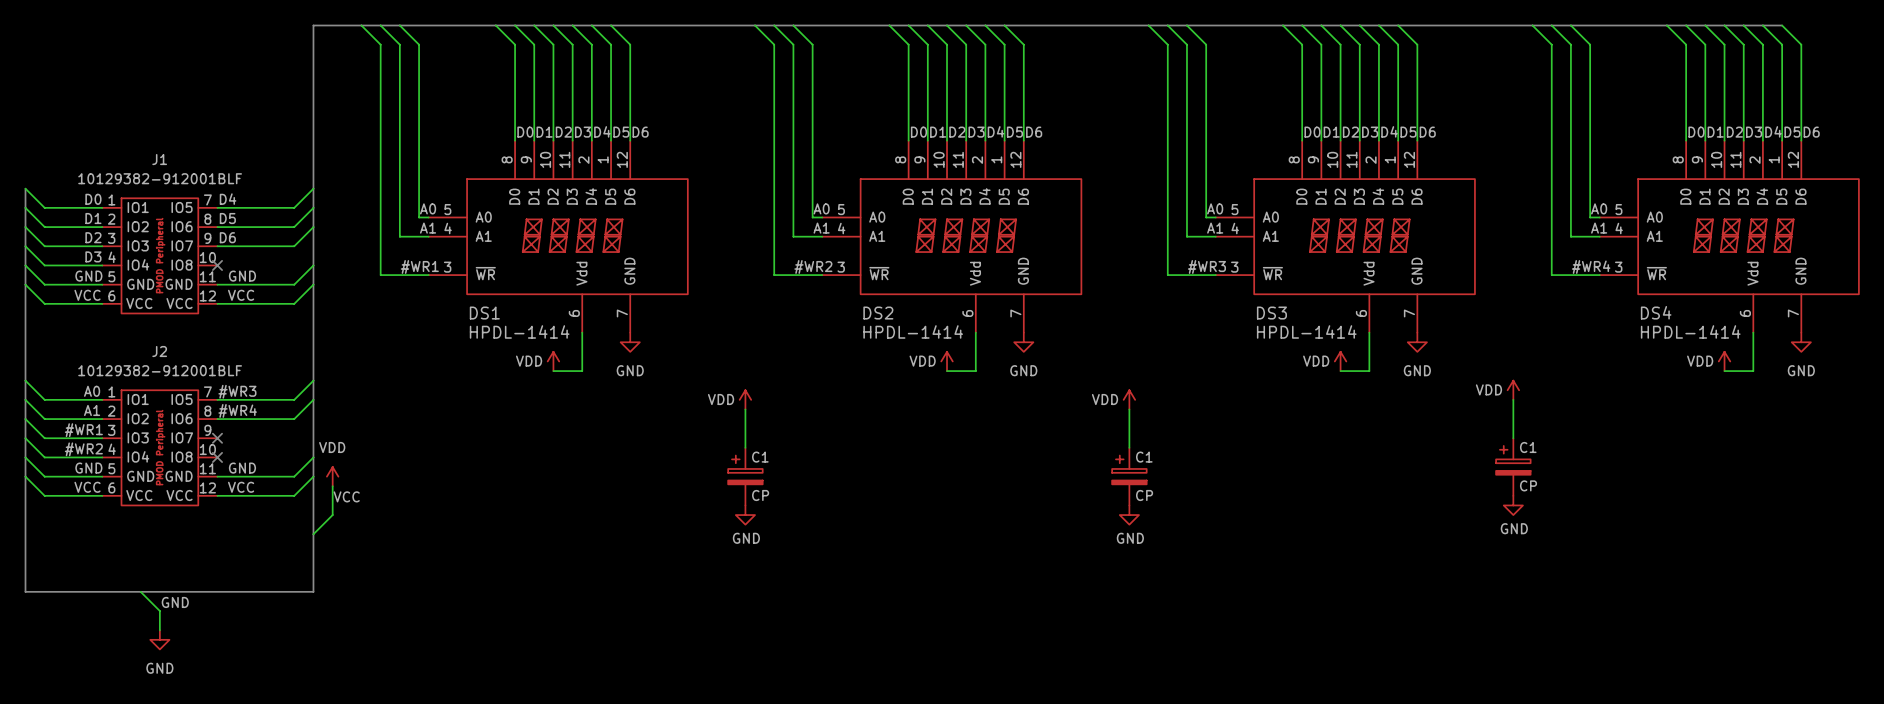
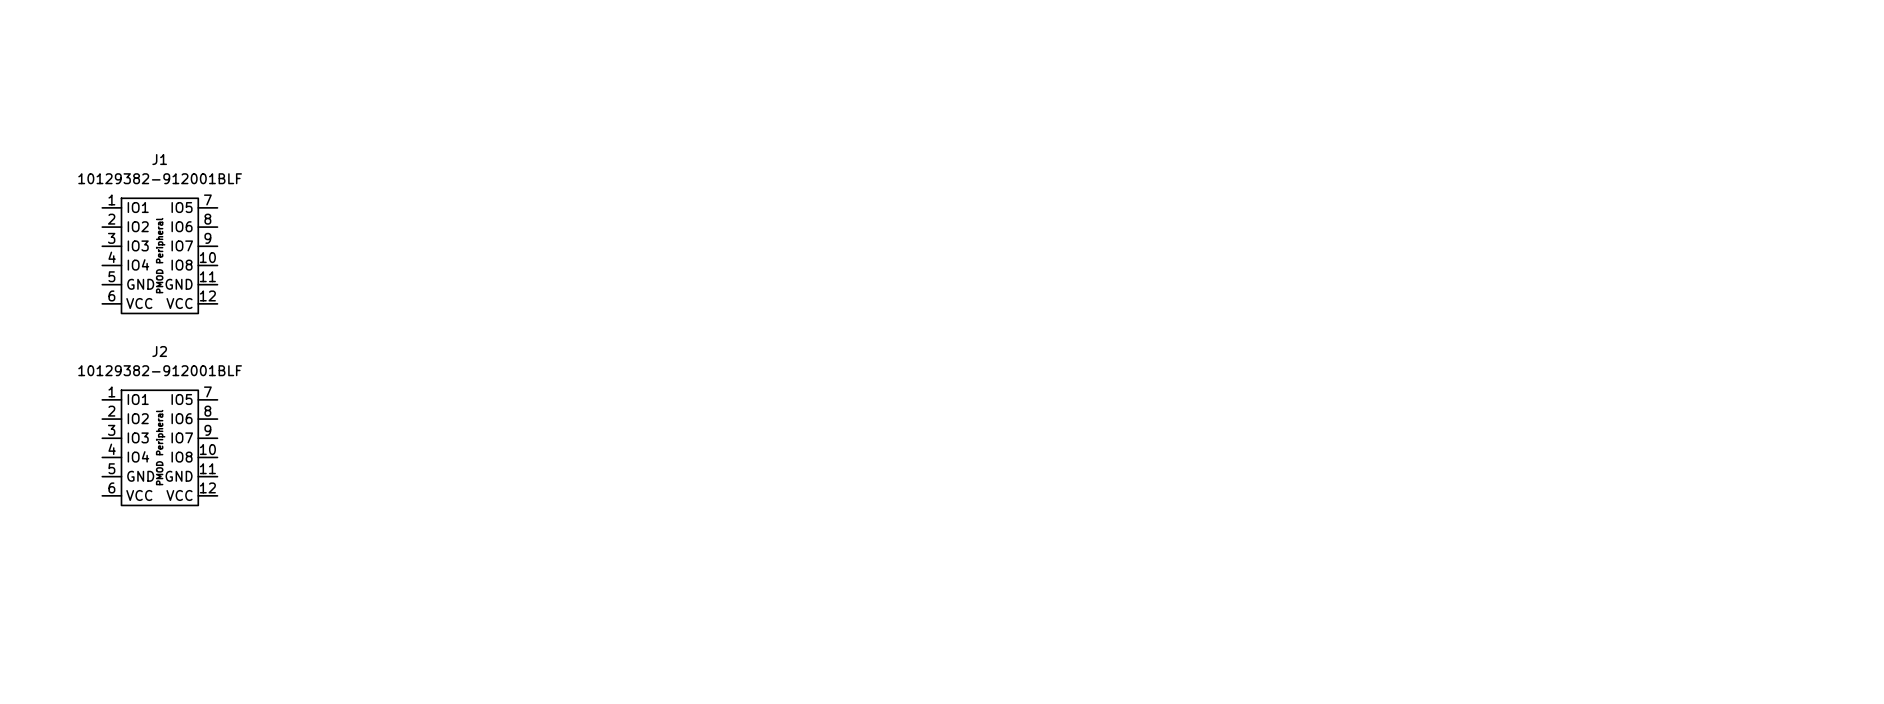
wire: (361, 25) (380, 44) (380, 275) (428, 275) -> none
wire: (380, 25) (399, 44) (399, 236) (428, 236) -> none
wire: (399, 25) (419, 44) (419, 217) (428, 217) -> none
wire: (495, 25) (515, 44) (515, 140) -> none
wire: (515, 25) (534, 44) (534, 140) -> none
wire: (534, 25) (553, 44) (553, 140) -> none
wire: (553, 25) (572, 44) (572, 140) -> none
wire: (572, 25) (591, 44) (591, 140) -> none
wire: (591, 25) (611, 44) (611, 140) -> none
wire: (611, 25) (630, 44) (630, 140) -> none
wire: (755, 25) (774, 44) (774, 275) (822, 275) -> none
wire: (774, 25) (793, 44) (793, 236) (822, 236) -> none
wire: (793, 25) (812, 44) (812, 217) (822, 217) -> none
wire: (889, 25) (908, 44) (908, 140) -> none
wire: (908, 25) (927, 44) (927, 140) -> none
wire: (927, 25) (947, 44) (947, 140) -> none
wire: (947, 25) (966, 44) (966, 140) -> none
wire: (966, 25) (985, 44) (985, 140) -> none
wire: (985, 25) (1004, 44) (1004, 140) -> none
wire: (1004, 25) (1023, 44) (1023, 140) -> none
wire: (1148, 25) (1167, 44) (1167, 275) (1215, 275) -> none
wire: (1167, 25) (1186, 44) (1186, 236) (1215, 236) -> none
wire: (1186, 25) (1206, 44) (1206, 217) (1215, 217) -> none
wire: (1282, 25) (1302, 44) (1302, 140) -> none
wire: (1302, 25) (1321, 44) (1321, 140) -> none
wire: (1321, 25) (1340, 44) (1340, 140) -> none
wire: (1340, 25) (1359, 44) (1359, 140) -> none
wire: (1359, 25) (1378, 44) (1378, 140) -> none
wire: (1378, 25) (1398, 44) (1398, 140) -> none
wire: (1398, 25) (1417, 44) (1417, 140) -> none
wire: (1532, 25) (1551, 44) (1551, 275) (1599, 275) -> none
wire: (1551, 25) (1570, 44) (1570, 236) (1599, 236) -> none
wire: (1570, 25) (1590, 44) (1590, 217) (1599, 217) -> none
wire: (1666, 25) (1686, 44) (1686, 140) -> none
wire: (1686, 25) (1705, 44) (1705, 140) -> none
wire: (1705, 25) (1724, 44) (1724, 140) -> none
wire: (1724, 25) (1743, 44) (1743, 140) -> none
wire: (1743, 25) (1762, 44) (1762, 140) -> none
wire: (1762, 25) (1782, 44) (1782, 140) -> none
wire: (1782, 25) (1801, 44) (1801, 140) -> none
bus: (1782, 25) (313, 25) (313, 591) (25, 591) (25, 188) -> none
label: D4 (602, 131) -> none
label: D4 (995, 131) -> none
label: D4 (1389, 131) -> none
label: D4 (1773, 131) -> none
label: D0 (525, 132) -> none
label: D1 (544, 132) -> none
label: D2 (563, 132) -> none
label: D3 (583, 132) -> none
label: D5 (621, 132) -> none
label: D6 (640, 132) -> none
label: D0 (918, 132) -> none
label: D1 (938, 132) -> none
label: D2 (957, 132) -> none
label: D3 (976, 132) -> none
label: D5 (1014, 132) -> none
label: D6 (1034, 132) -> none
label: D0 (1312, 132) -> none
label: D1 (1331, 132) -> none
label: D2 (1350, 132) -> none
label: D3 (1370, 132) -> none
label: D5 (1408, 132) -> none
label: D6 (1427, 132) -> none
label: D0 (1696, 132) -> none
label: D1 (1715, 132) -> none
label: D2 (1734, 132) -> none
label: D3 (1754, 132) -> none
label: D5 (1792, 132) -> none
label: D6 (1811, 132) -> none
wire: (25, 188) (44, 207) (102, 207) -> none
wire: (313, 188) (294, 207) (217, 207) -> none
label: D0 (93, 199) -> none
label: D4 (228, 199) -> none
wire: (25, 207) (44, 227) (102, 227) -> none
wire: (313, 207) (294, 227) (217, 227) -> none
label: A0 (428, 208) -> none
label: A0 (821, 208) -> none
label: A0 (1215, 208) -> none
label: A0 (1599, 208) -> none
label: D1 (93, 218) -> none
label: D5 (227, 218) -> none
wire: (25, 227) (44, 246) (102, 246) -> none
wire: (313, 227) (294, 246) (217, 246) -> none
label: A1 (428, 228) -> none
label: A1 (821, 228) -> none
label: A1 (1215, 228) -> none
label: A1 (1599, 228) -> none
DS1: HPDL-1414 (558, 236) -> none
DS2: HPDL-1414 (951, 236) -> none
DS3: HPDL-1414 (1345, 236) -> none
DS4: HPDL-1414 (1729, 236) -> none
label: D2 (93, 237) -> none
label: D6 (227, 237) -> none
wire: (25, 246) (44, 265) (102, 265) -> none
label: D3 (93, 256) -> none
wire: (25, 265) (44, 284) (102, 284) -> none
no-connect mark: (217, 265) -> none
wire: (313, 265) (294, 284) (217, 284) -> none
label: #WR1 (419, 266) -> none
label: #WR2 (813, 266) -> none
label: #WR3 (1206, 266) -> none
label: #WR4 (1591, 266) -> none
label: GND (88, 276) -> none
label: GND (242, 276) -> none
wire: (25, 284) (44, 303) (102, 303) -> none
wire: (313, 284) (294, 303) (217, 303) -> none
label: VCC (87, 295) -> none
label: VCC (241, 295) -> none
wire: (582, 332) (582, 371) (553, 371) -> none
wire: (975, 332) (975, 371) (947, 371) -> none
wire: (1369, 332) (1369, 371) (1340, 371) -> none
wire: (1753, 332) (1753, 371) (1724, 371) -> none
power symbol: GND (630, 342) -> none
power symbol: GND (1023, 342) -> none
power symbol: GND (1417, 342) -> none
power symbol: GND (1801, 342) -> none
power symbol: VDD (553, 361) -> none
power symbol: VDD (947, 361) -> none
power symbol: VDD (1340, 361) -> none
power symbol: VDD (1724, 361) -> none
wire: (25, 380) (44, 399) (102, 399) -> none
wire: (313, 380) (294, 399) (217, 399) -> none
power symbol: VDD (1513, 390) -> none
label: A0 (92, 391) -> none
label: #WR3 (237, 391) -> none
wire: (25, 399) (44, 419) (102, 419) -> none
wire: (313, 399) (294, 419) (217, 419) -> none
power symbol: VDD (745, 399) -> none
power symbol: VDD (1129, 399) -> none
wire: (1513, 399) (1513, 438) -> none
wire: (745, 409) (745, 447) -> none
wire: (1129, 409) (1129, 447) -> none
label: A1 (92, 410) -> none
label: #WR4 (237, 410) -> none
wire: (25, 419) (44, 438) (102, 438) -> none
label: #WR1 (83, 430) -> none
wire: (25, 438) (44, 457) (102, 457) -> none
no-connect mark: (217, 438) -> none
label: #WR2 (83, 449) -> none
wire: (25, 457) (44, 476) (102, 476) -> none
no-connect mark: (217, 457) -> none
wire: (313, 457) (294, 476) (217, 476) -> none
C1: CP (1513, 467) -> none
label: GND (88, 468) -> none
label: GND (242, 468) -> none
wire: (25, 476) (44, 495) (102, 495) -> none
wire: (313, 476) (294, 495) (217, 495) -> none
power symbol: VDD (332, 476) -> none
C1: CP (745, 476) -> none
C1: CP (1129, 476) -> none
wire: (332, 486) (332, 515) (313, 534) -> none
label: VCC (87, 487) -> none
label: VCC (241, 487) -> none
label: VCC (346, 496) -> none
power symbol: GND (1513, 505) -> none
power symbol: GND (745, 515) -> none
power symbol: GND (1129, 515) -> none
wire: (140, 591) (159, 611) (159, 630) -> none
label: GND (175, 602) -> none
power symbol: GND (159, 639) -> none

